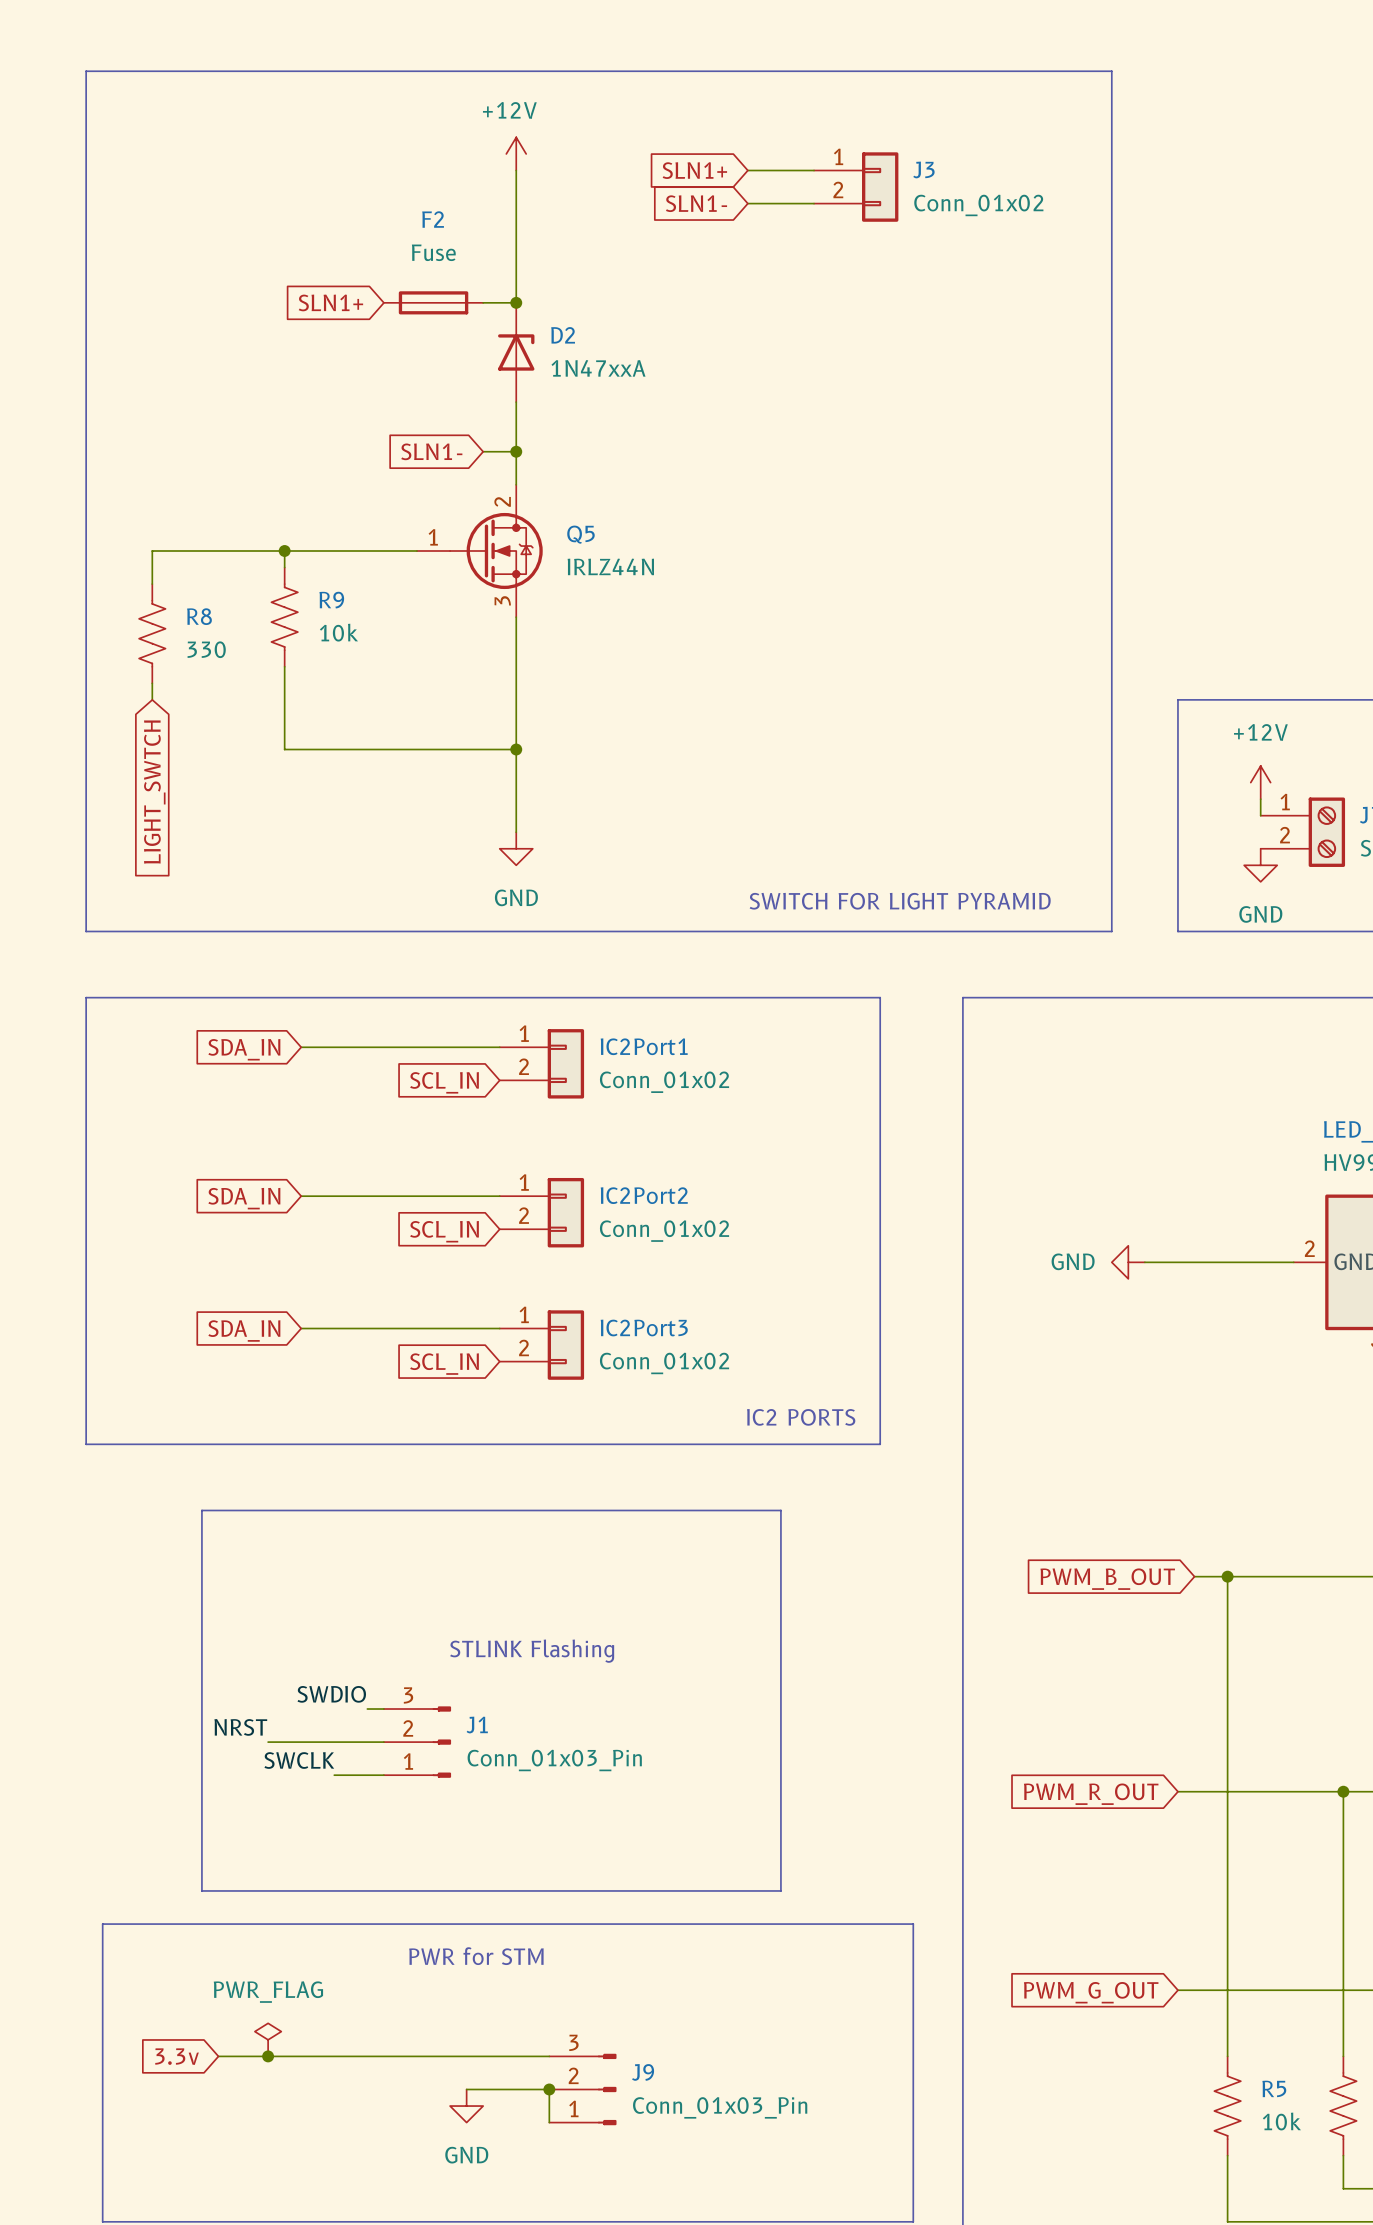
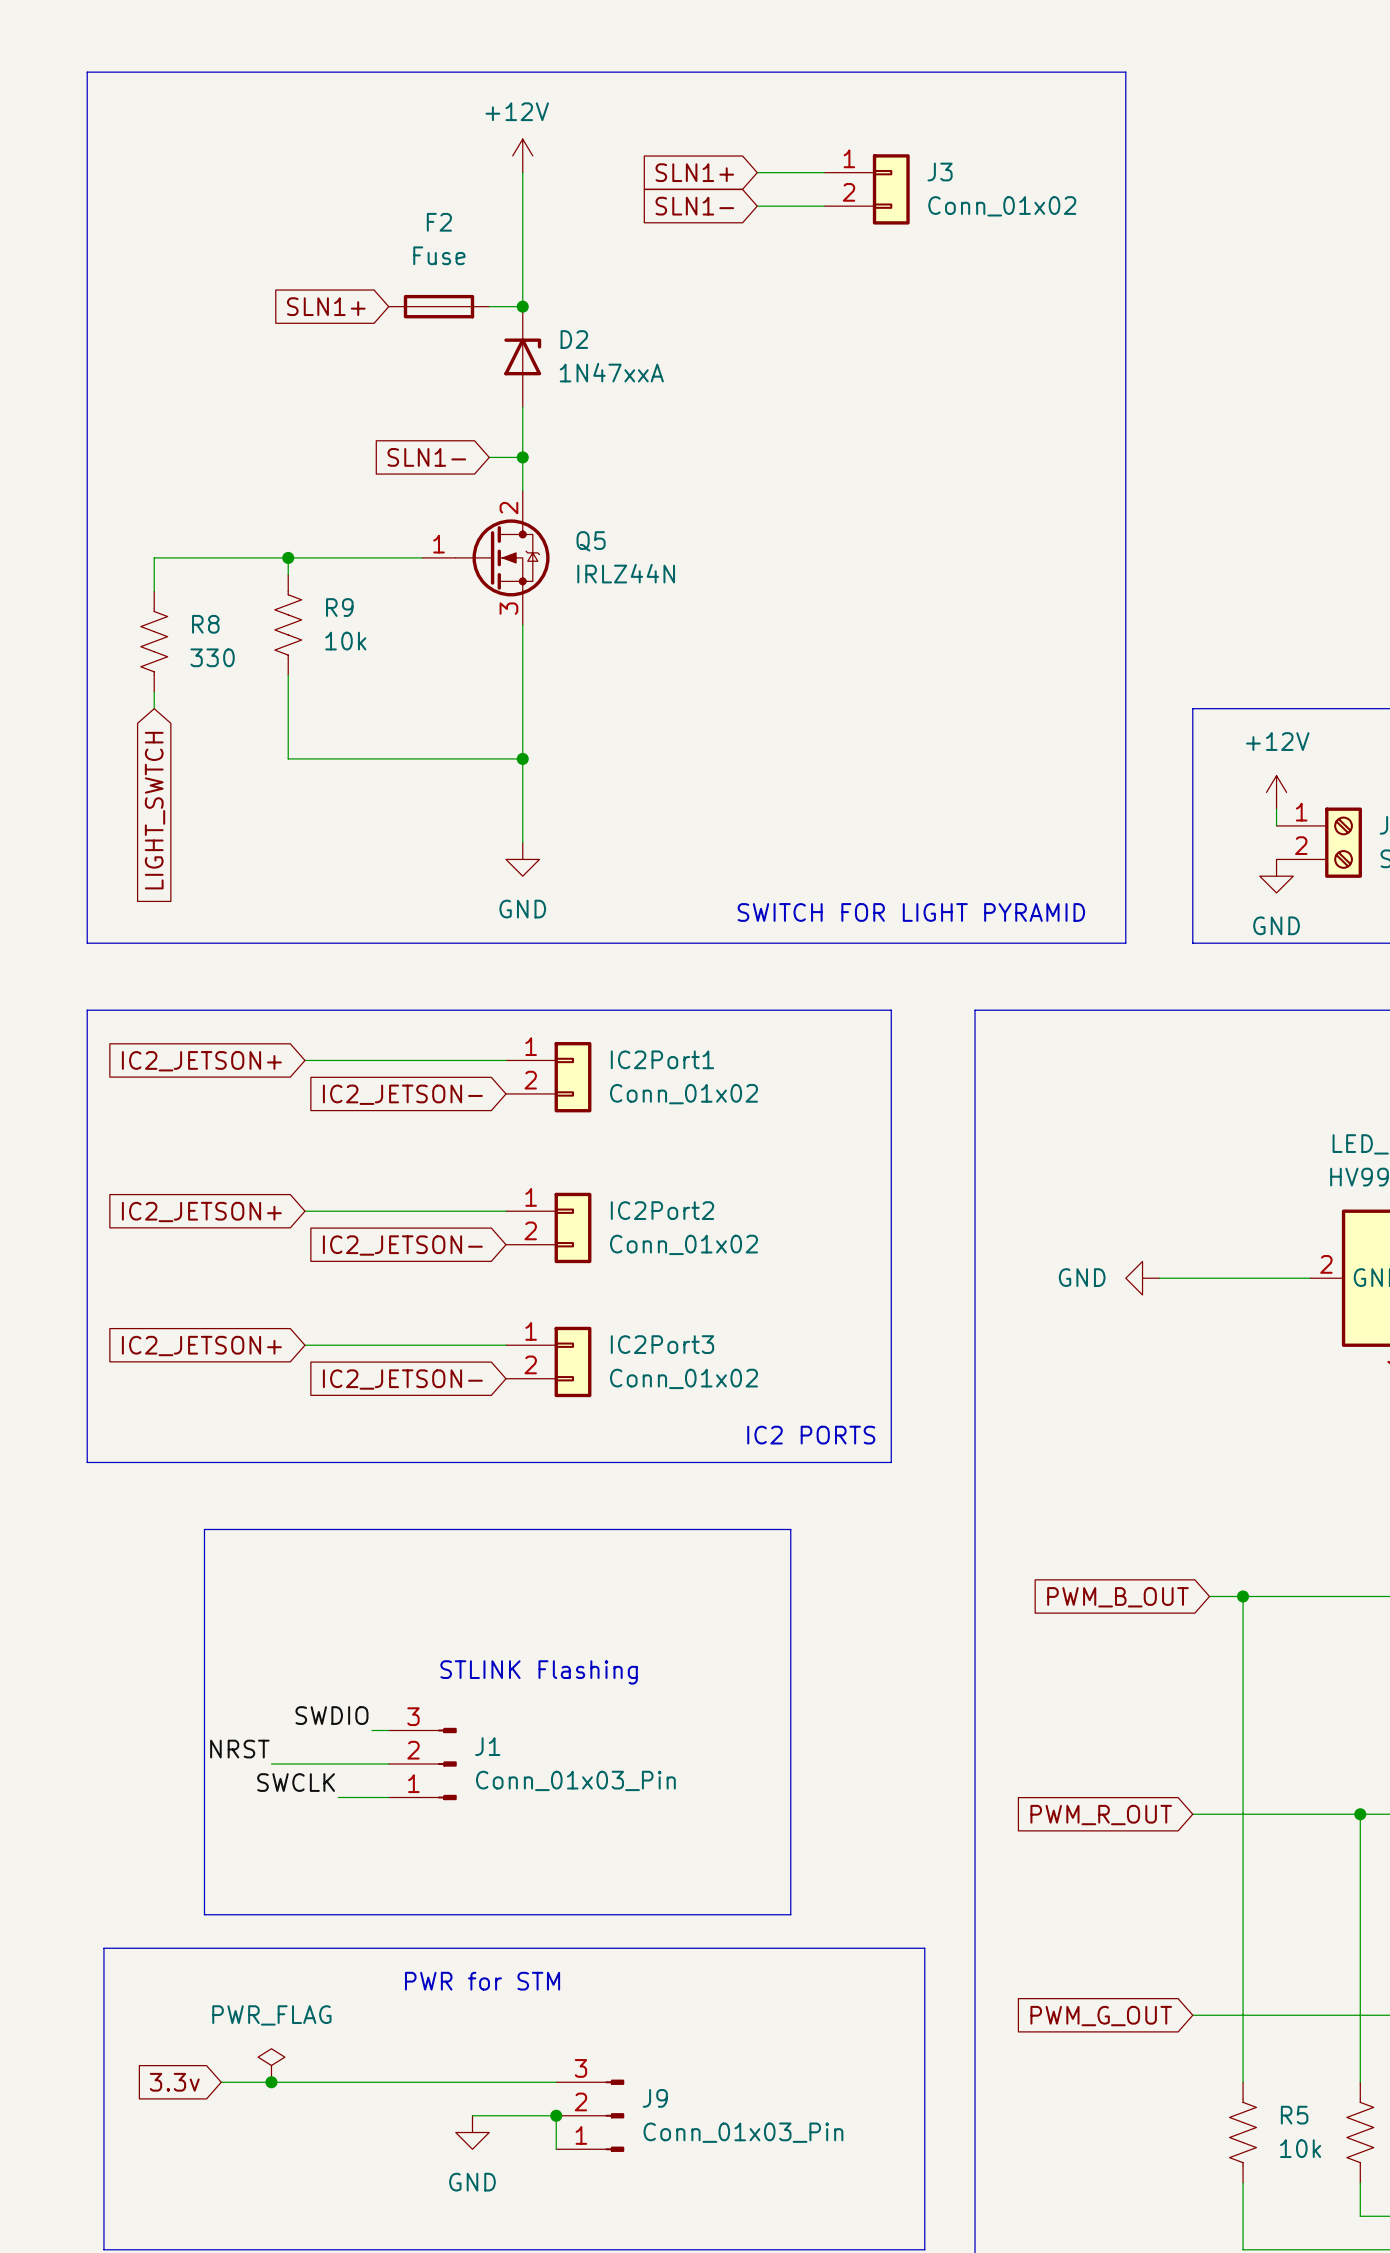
global label: SDA_IN (244, 1049) -> IC2_JETSON+ (201, 1061)
global label: SCL_IN (444, 1082) -> IC2_JETSON- (402, 1094)
global label: SDA_IN (244, 1198) -> IC2_JETSON+ (201, 1212)
global label: SCL_IN (444, 1231) -> IC2_JETSON- (402, 1245)
global label: SDA_IN (244, 1330) -> IC2_JETSON+ (201, 1346)
global label: SCL_IN (444, 1364) -> IC2_JETSON- (402, 1379)

